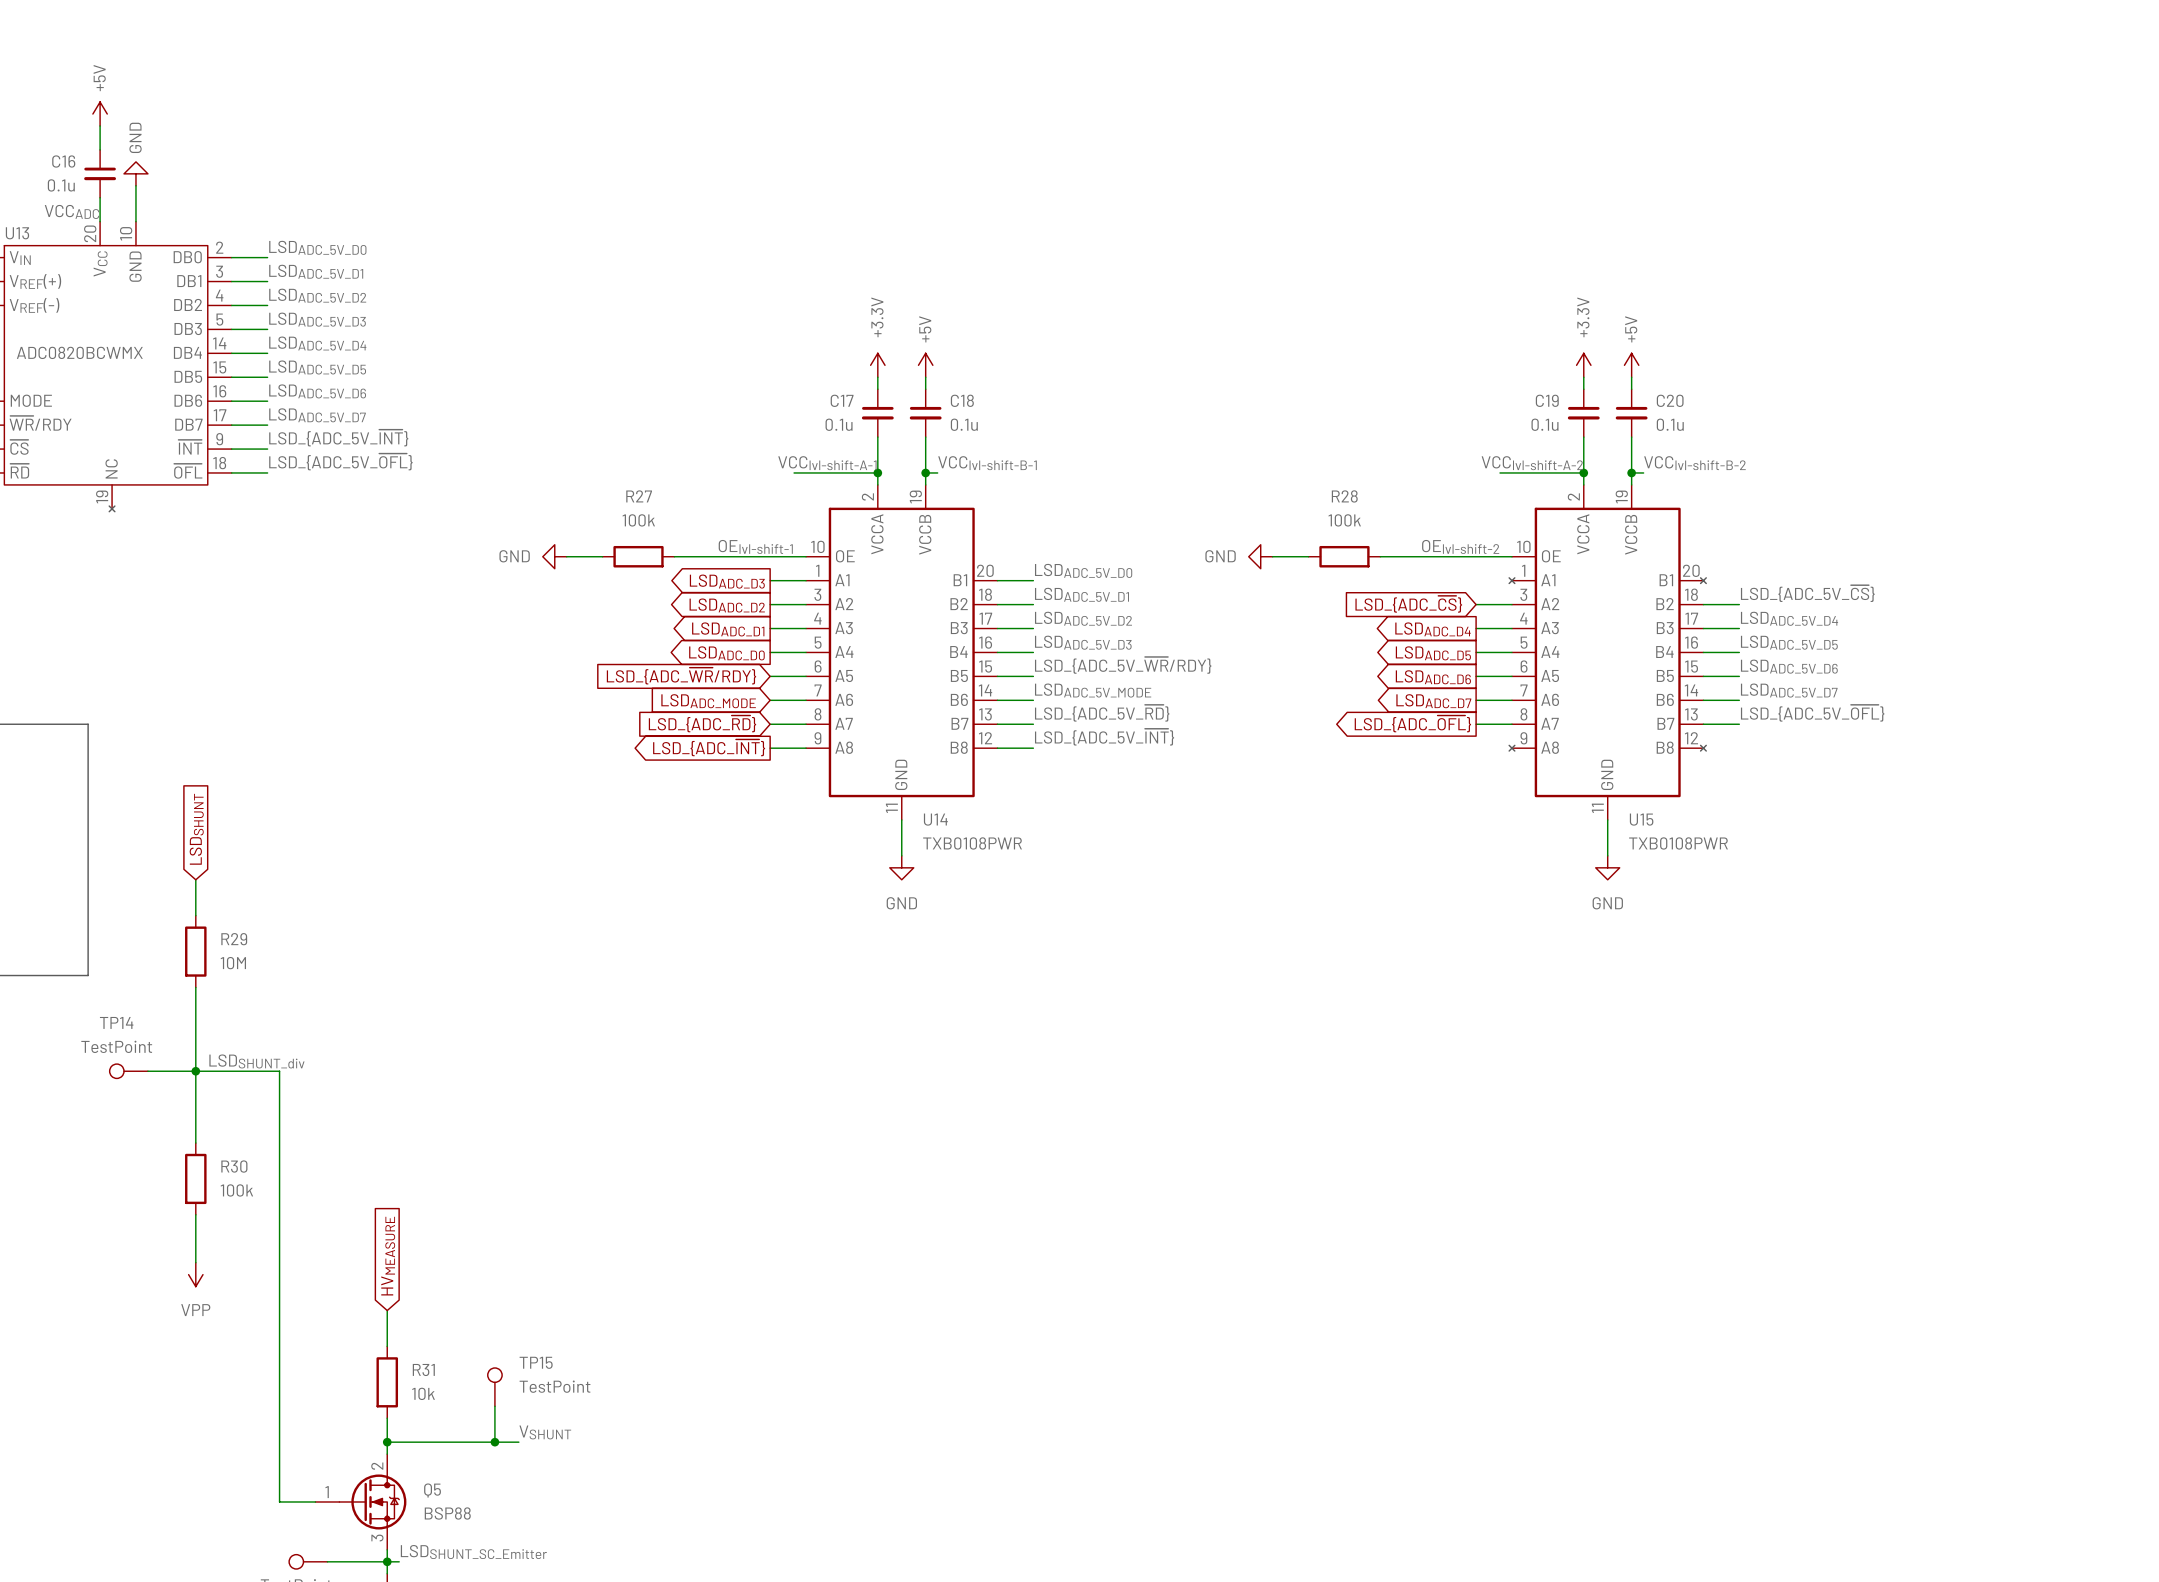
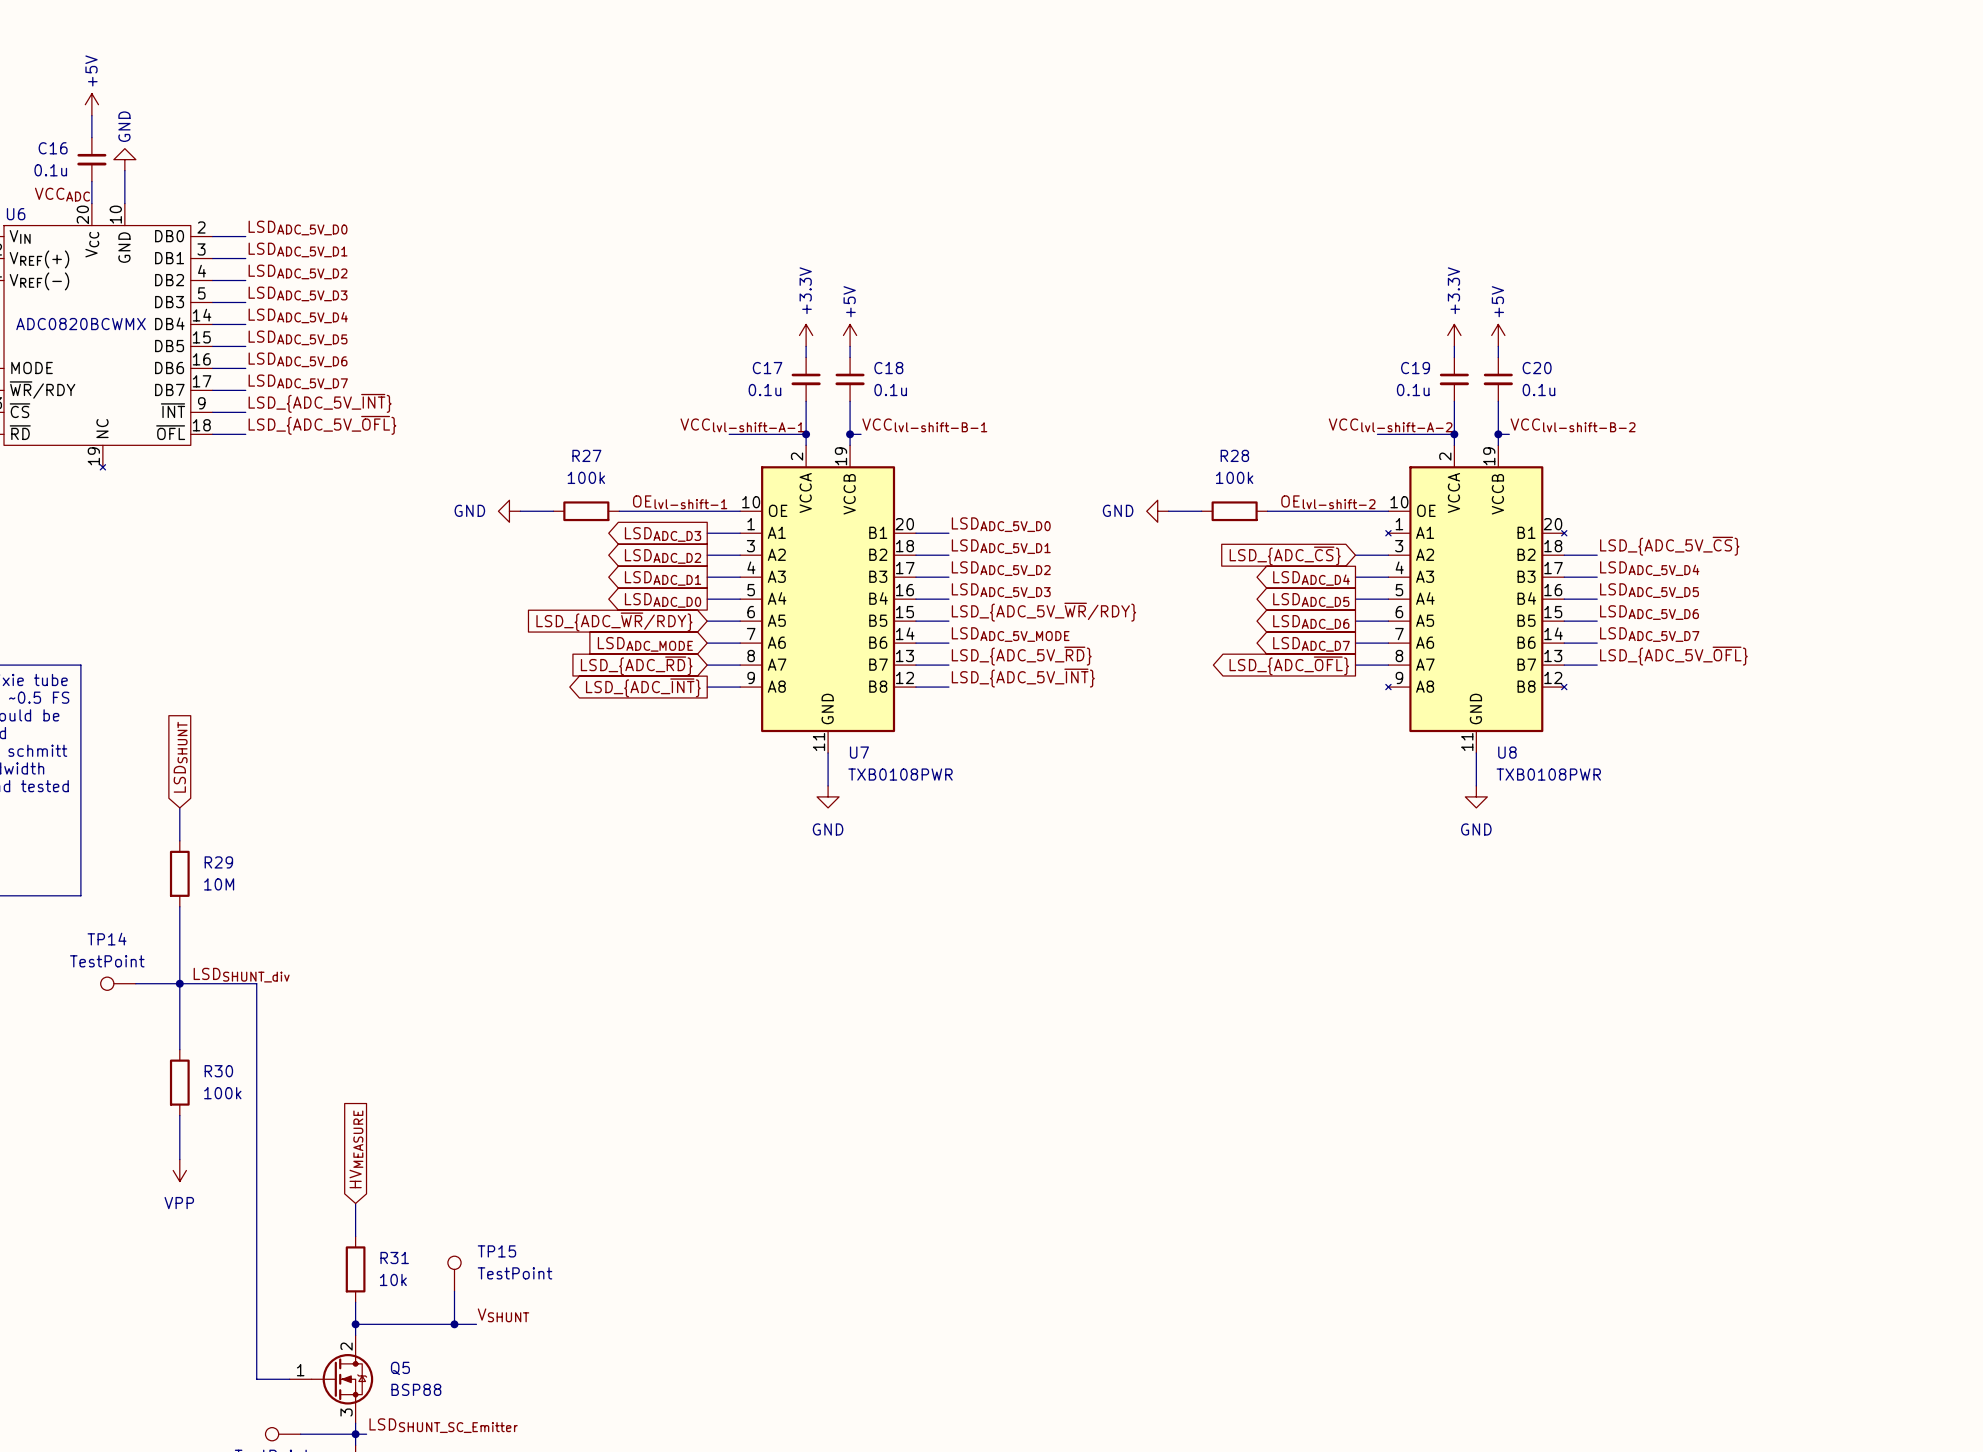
U13 name: U13 (17, 233) -> U6 (16, 214)
U14 name: U14 (935, 819) -> U7 (859, 752)
U15 name: U15 (1641, 819) -> U8 (1507, 752)

